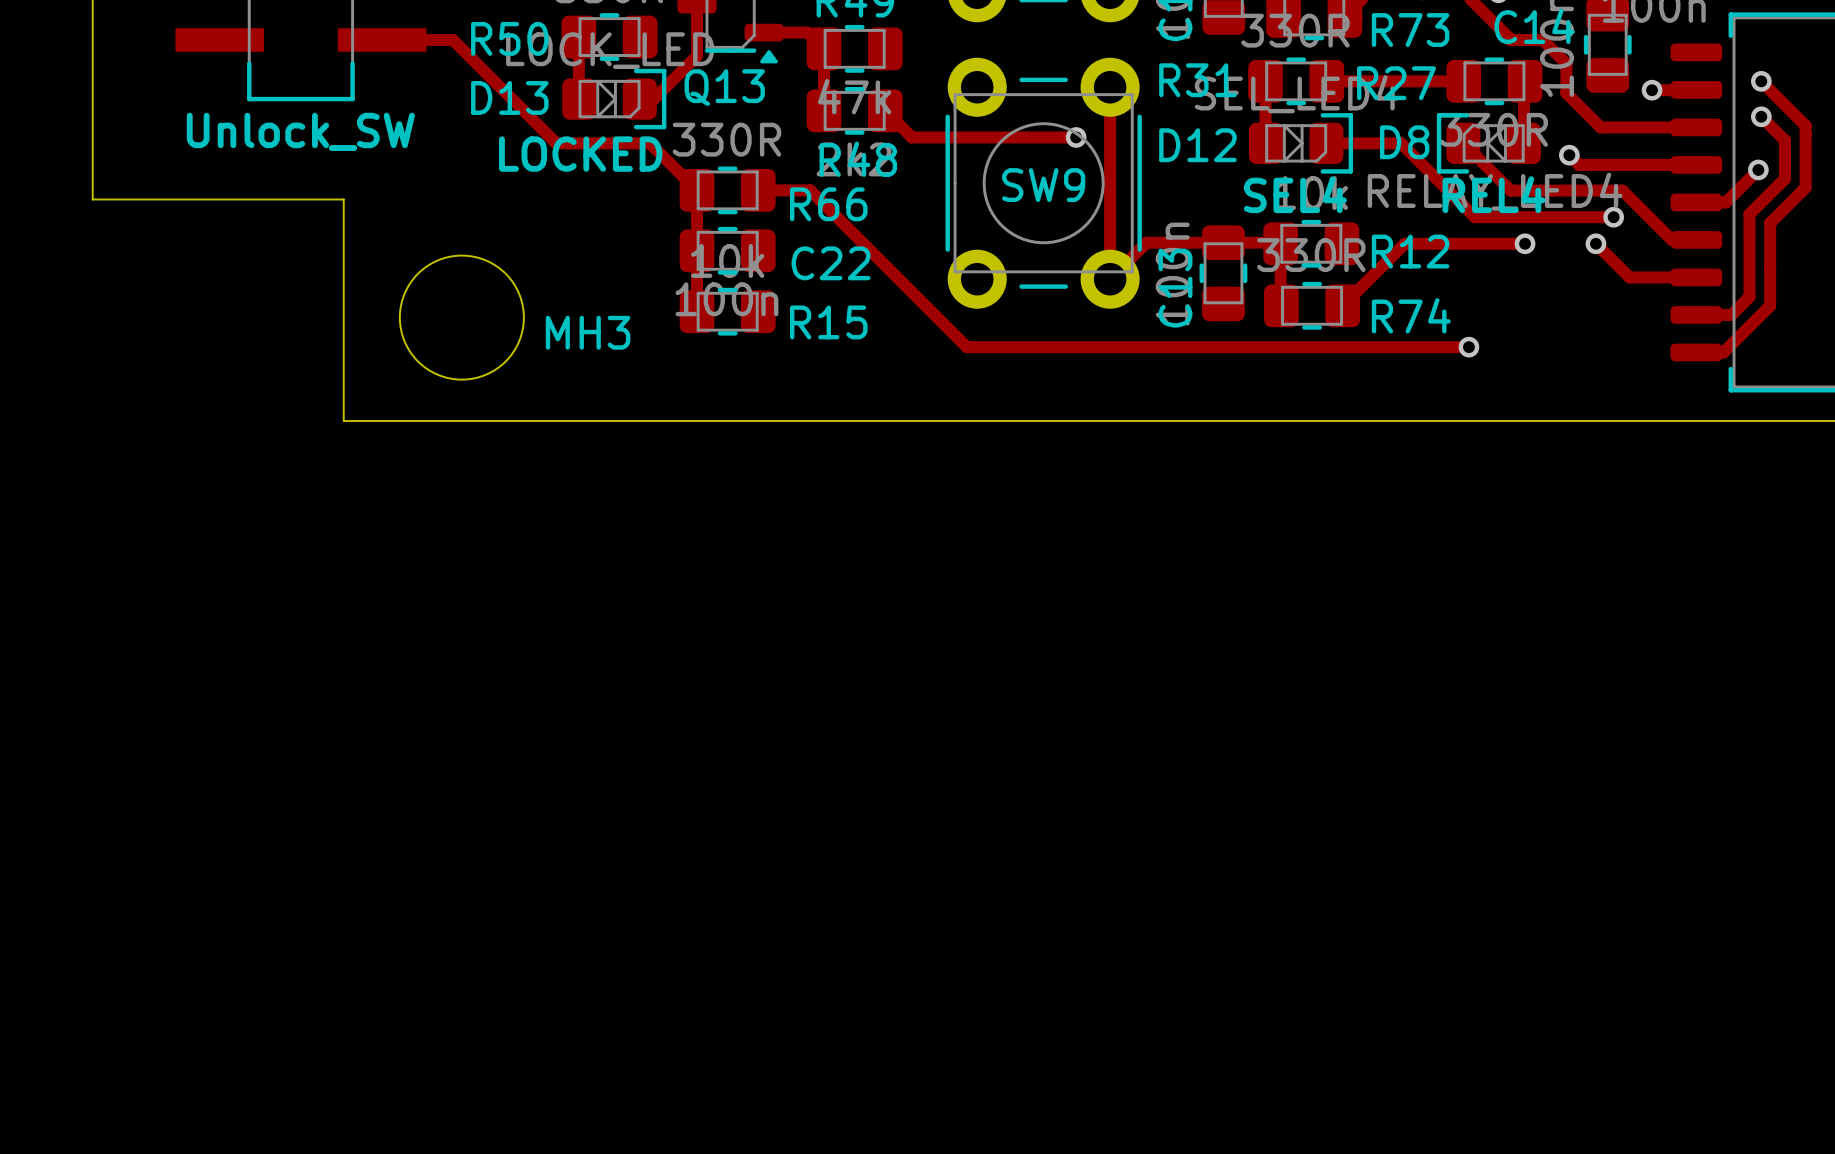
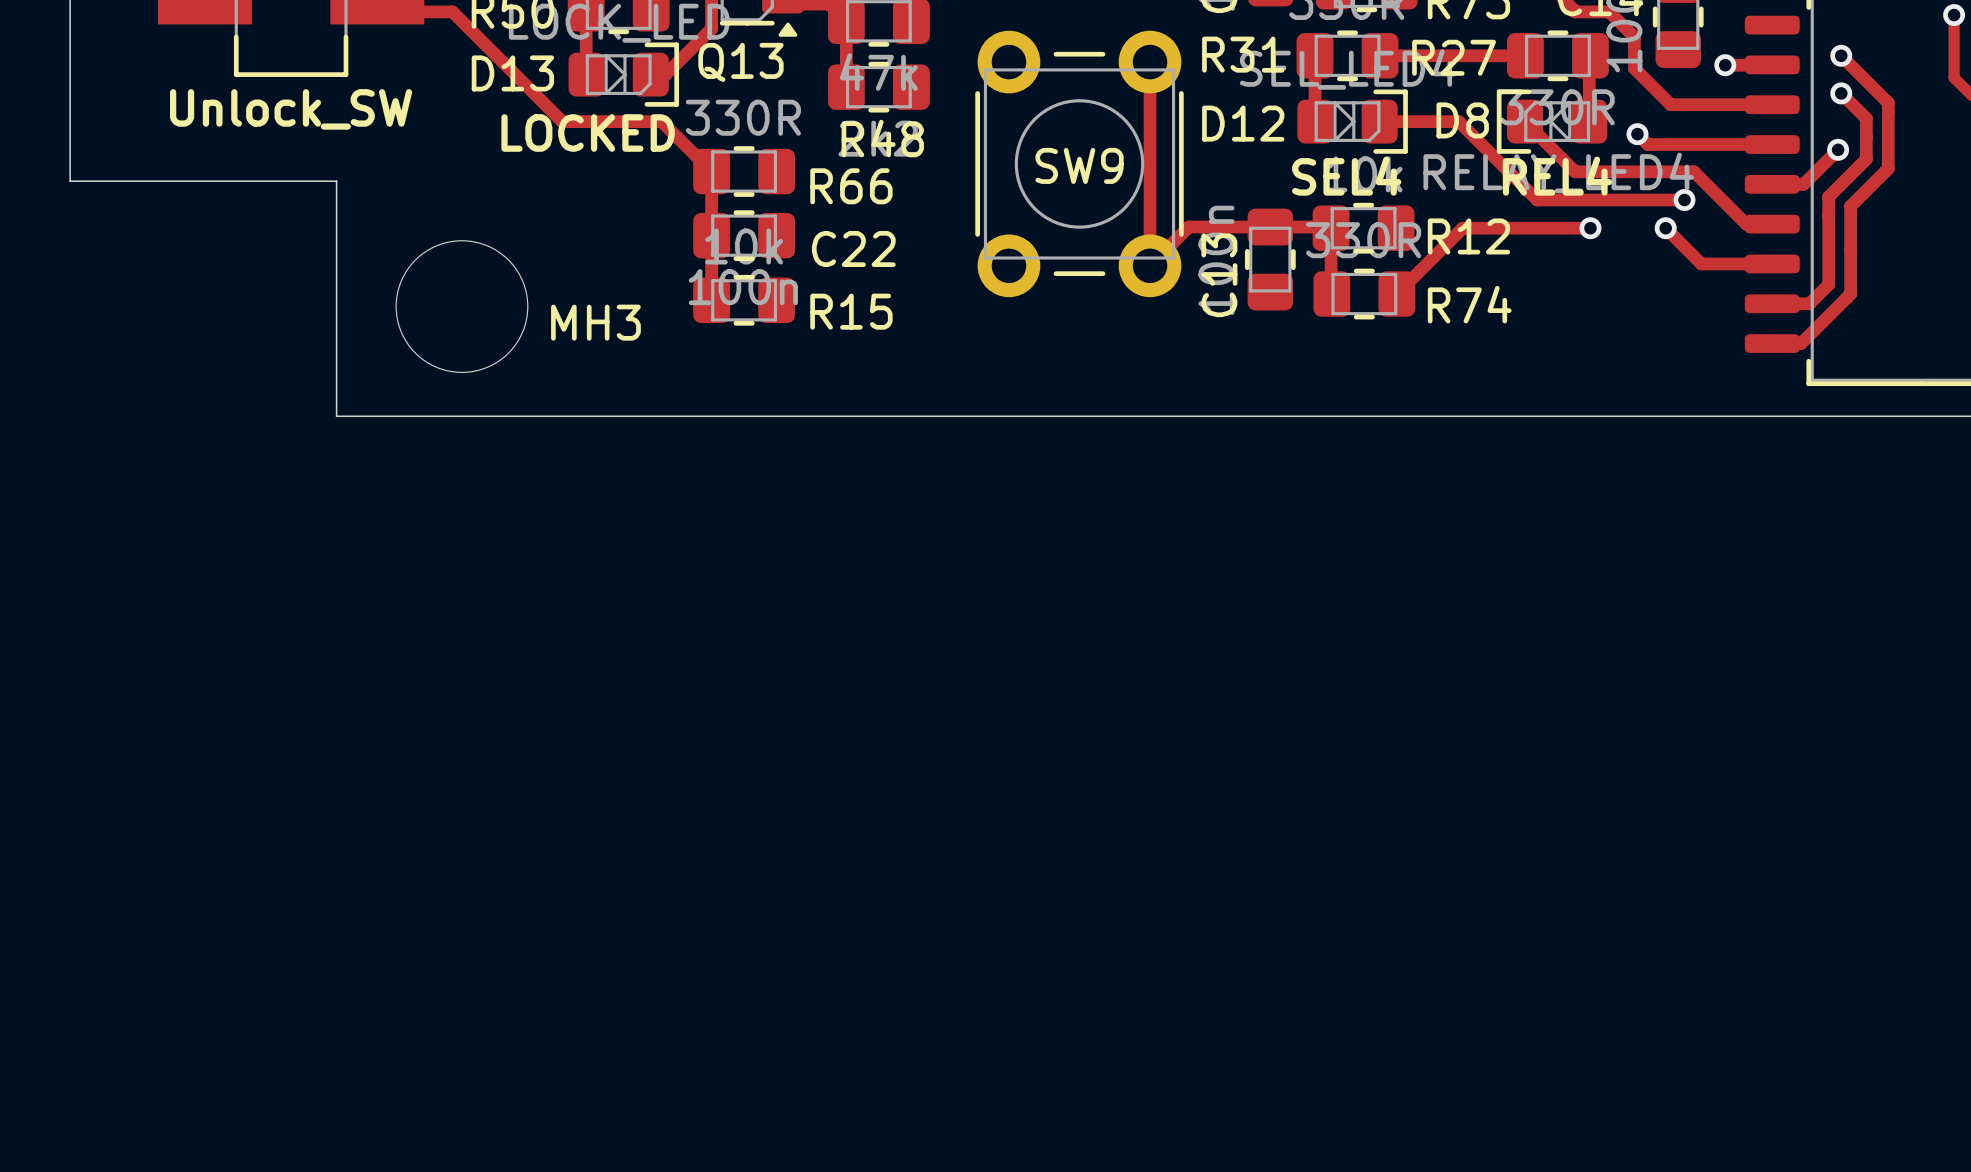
track: (885, 110) (911, 137) (1076, 137) -> none
via: (1076, 137) -> none
track: (758, 190) (810, 190) (966, 347) (1468, 347) -> none
via: (1468, 347) -> none

